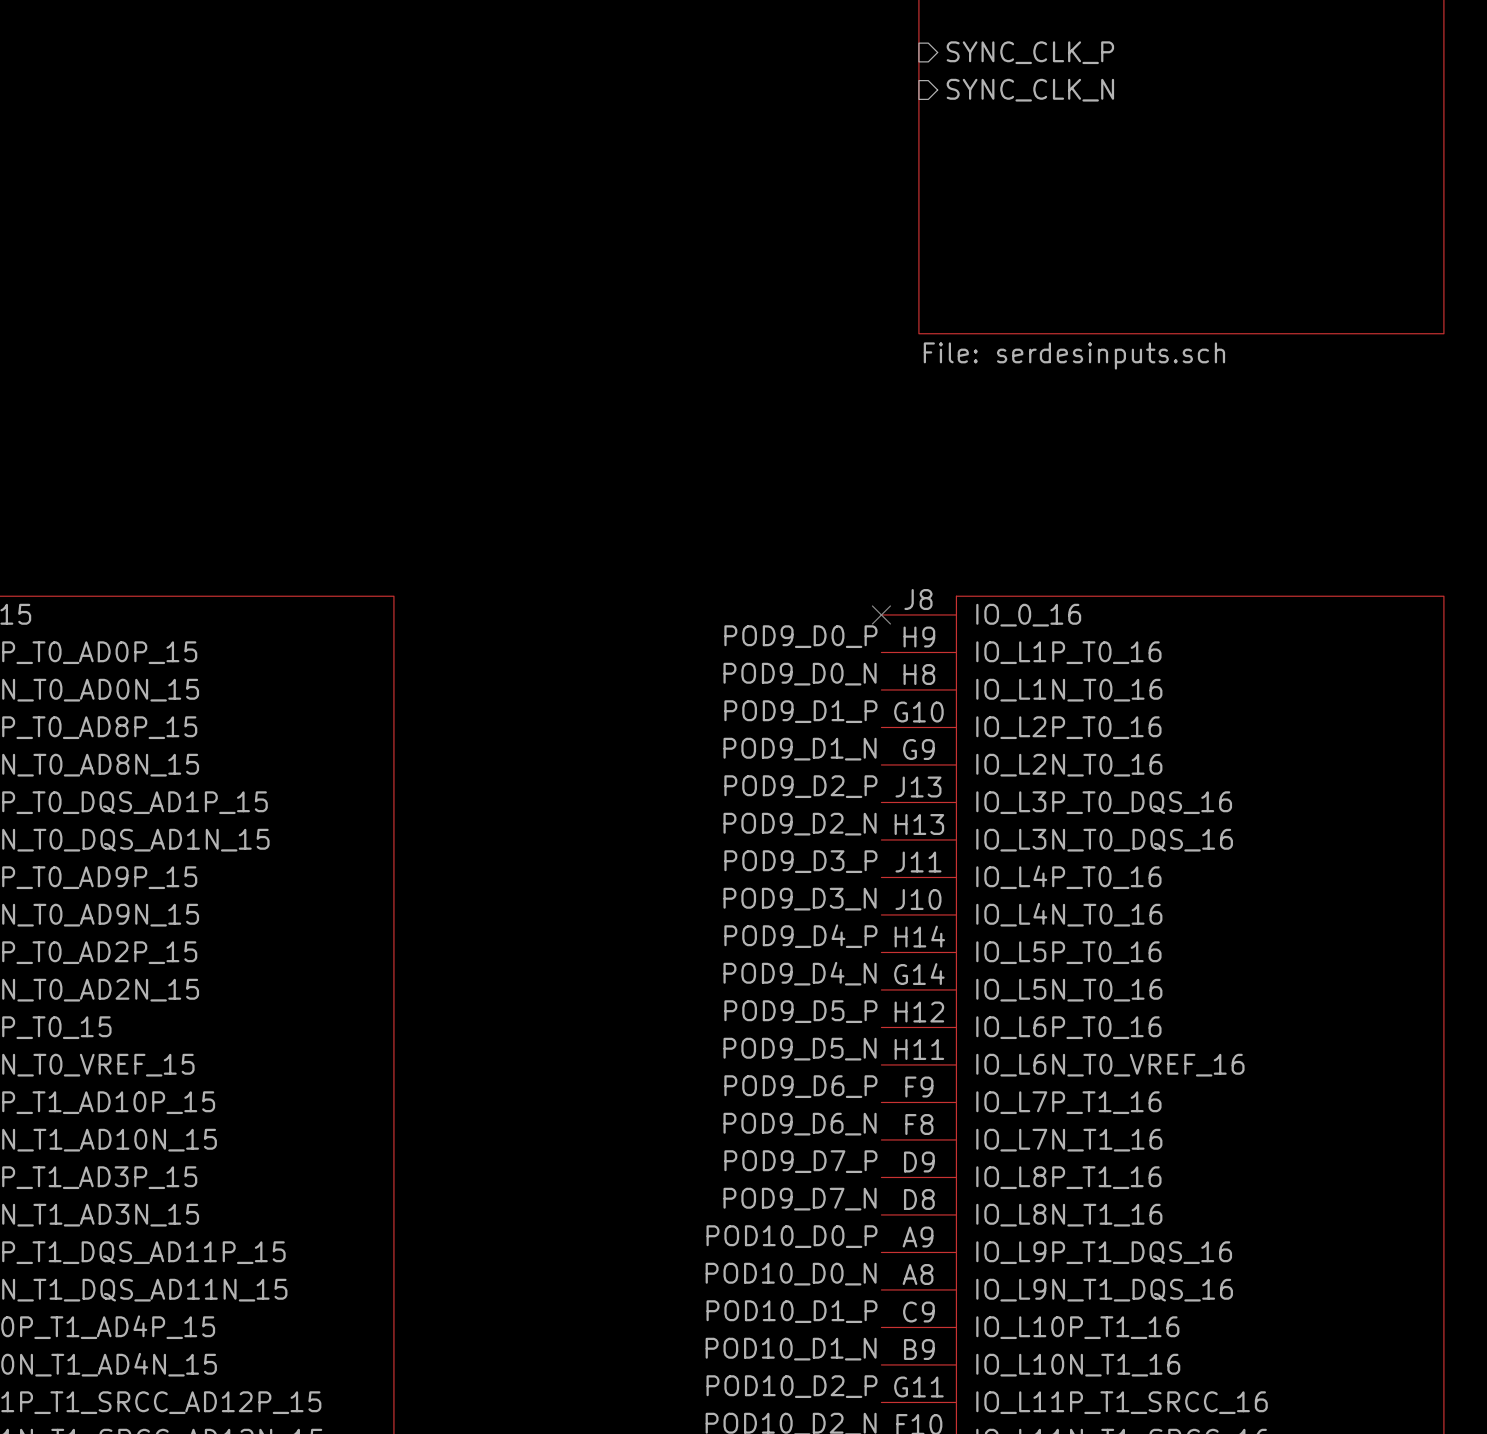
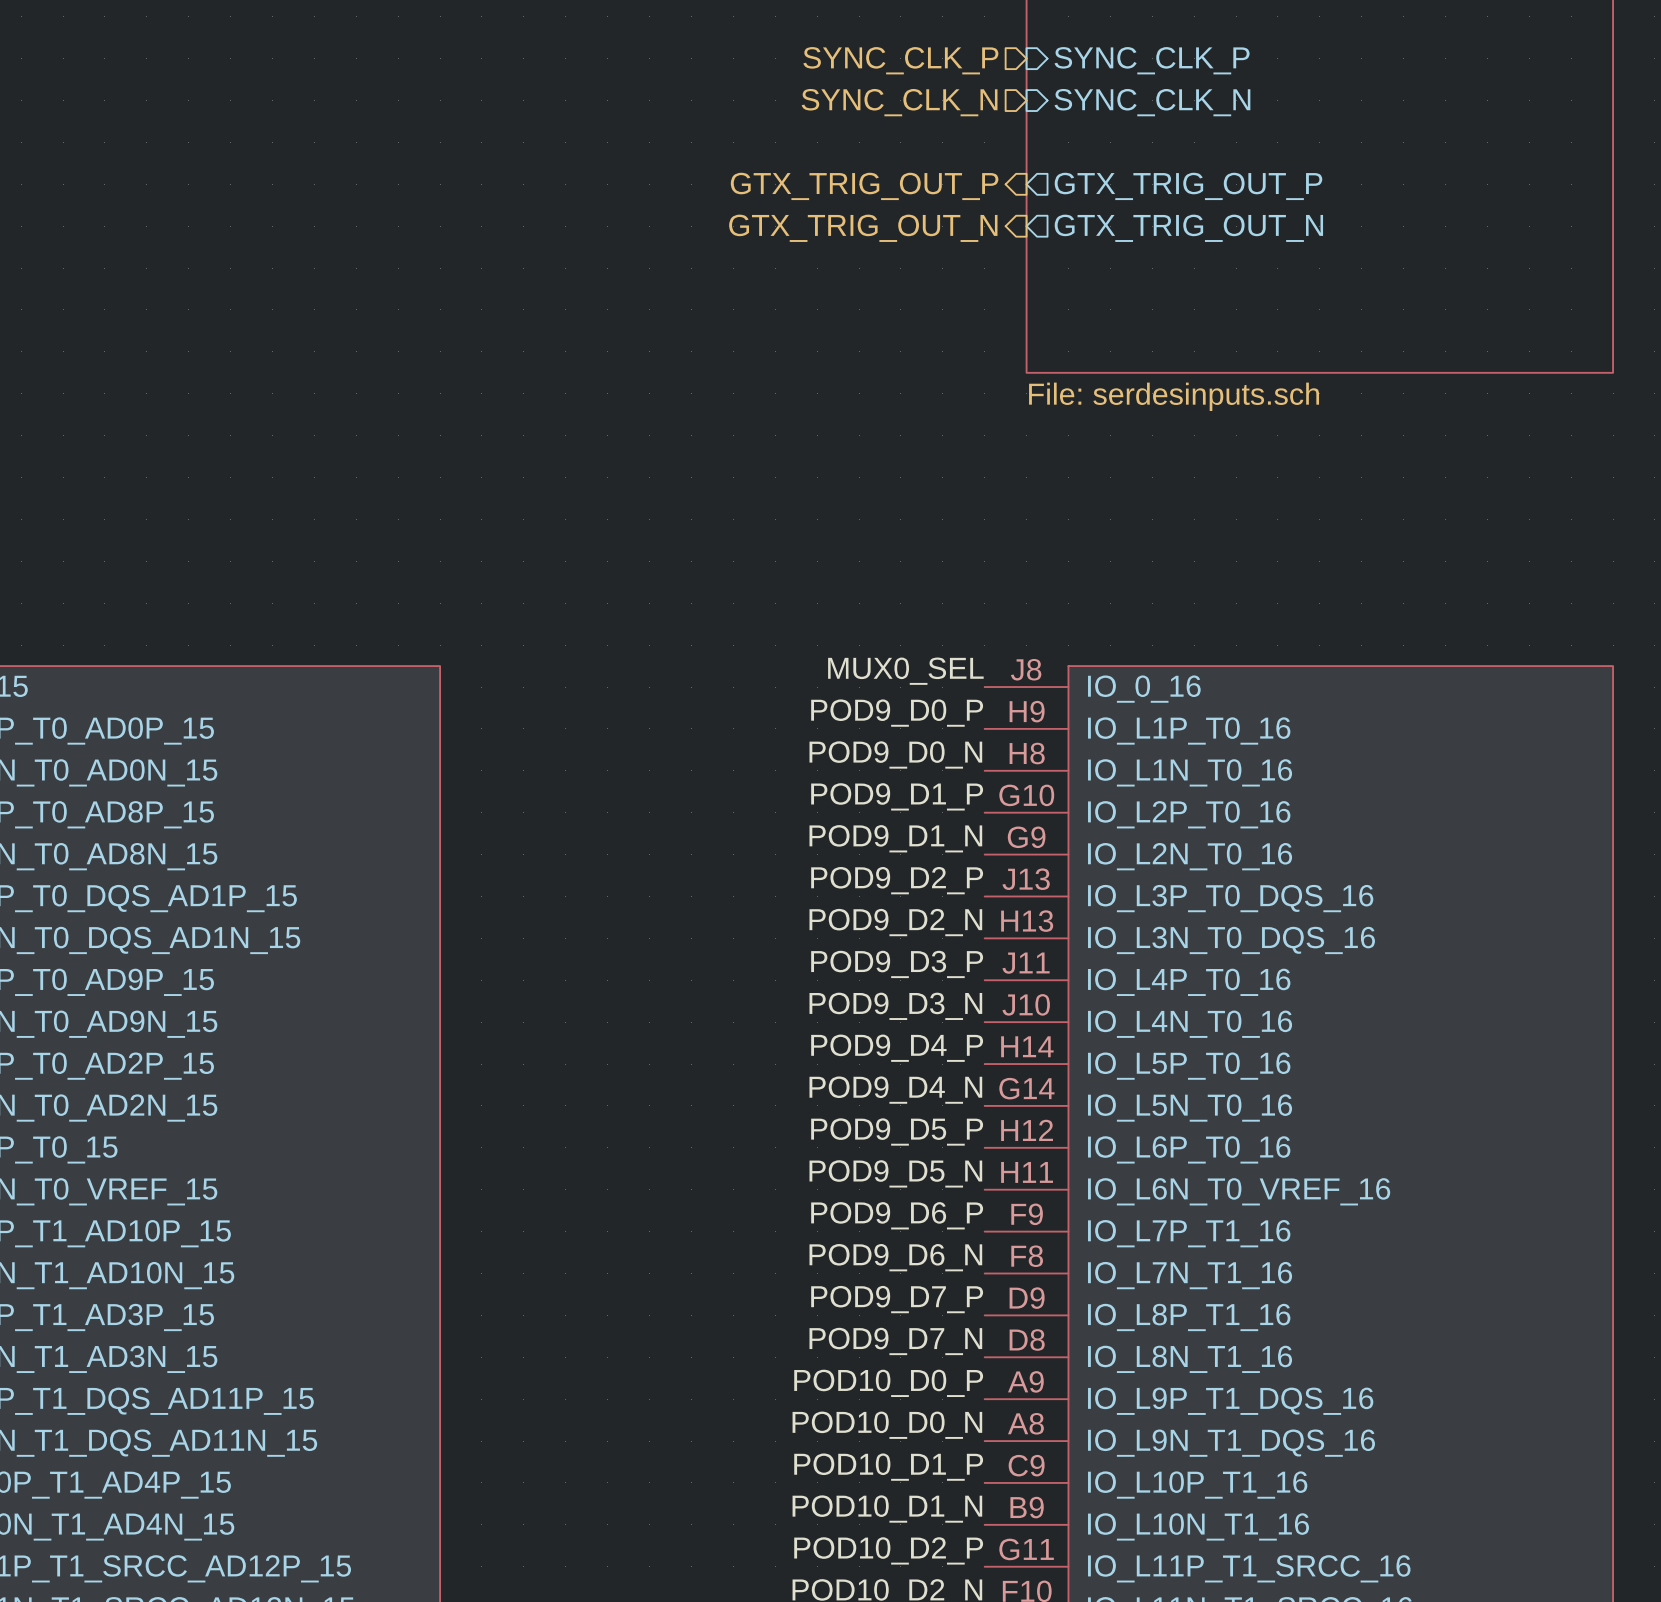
hierarchical label: none -> SYNC_CLK_P (900, 60)
hierarchical label: none -> SYNC_CLK_N (899, 102)
hierarchical label: none -> GTX_TRIG_OUT_P (864, 186)
sheet pin: none -> GTX_TRIG_OUT_P (1188, 186)
hierarchical label: none -> GTX_TRIG_OUT_N (863, 228)
sheet pin: none -> GTX_TRIG_OUT_N (1188, 228)
label: none -> MUX0_SEL (905, 671)
no-connect mark: (881, 614) -> none

